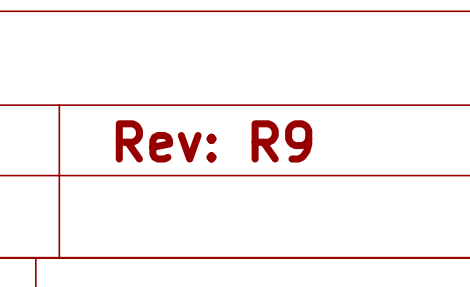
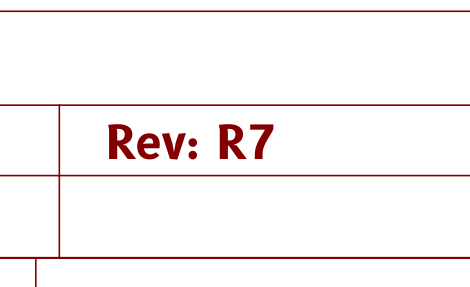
title block: Rev: R9 (214, 141) -> Rev: R7 (190, 141)

